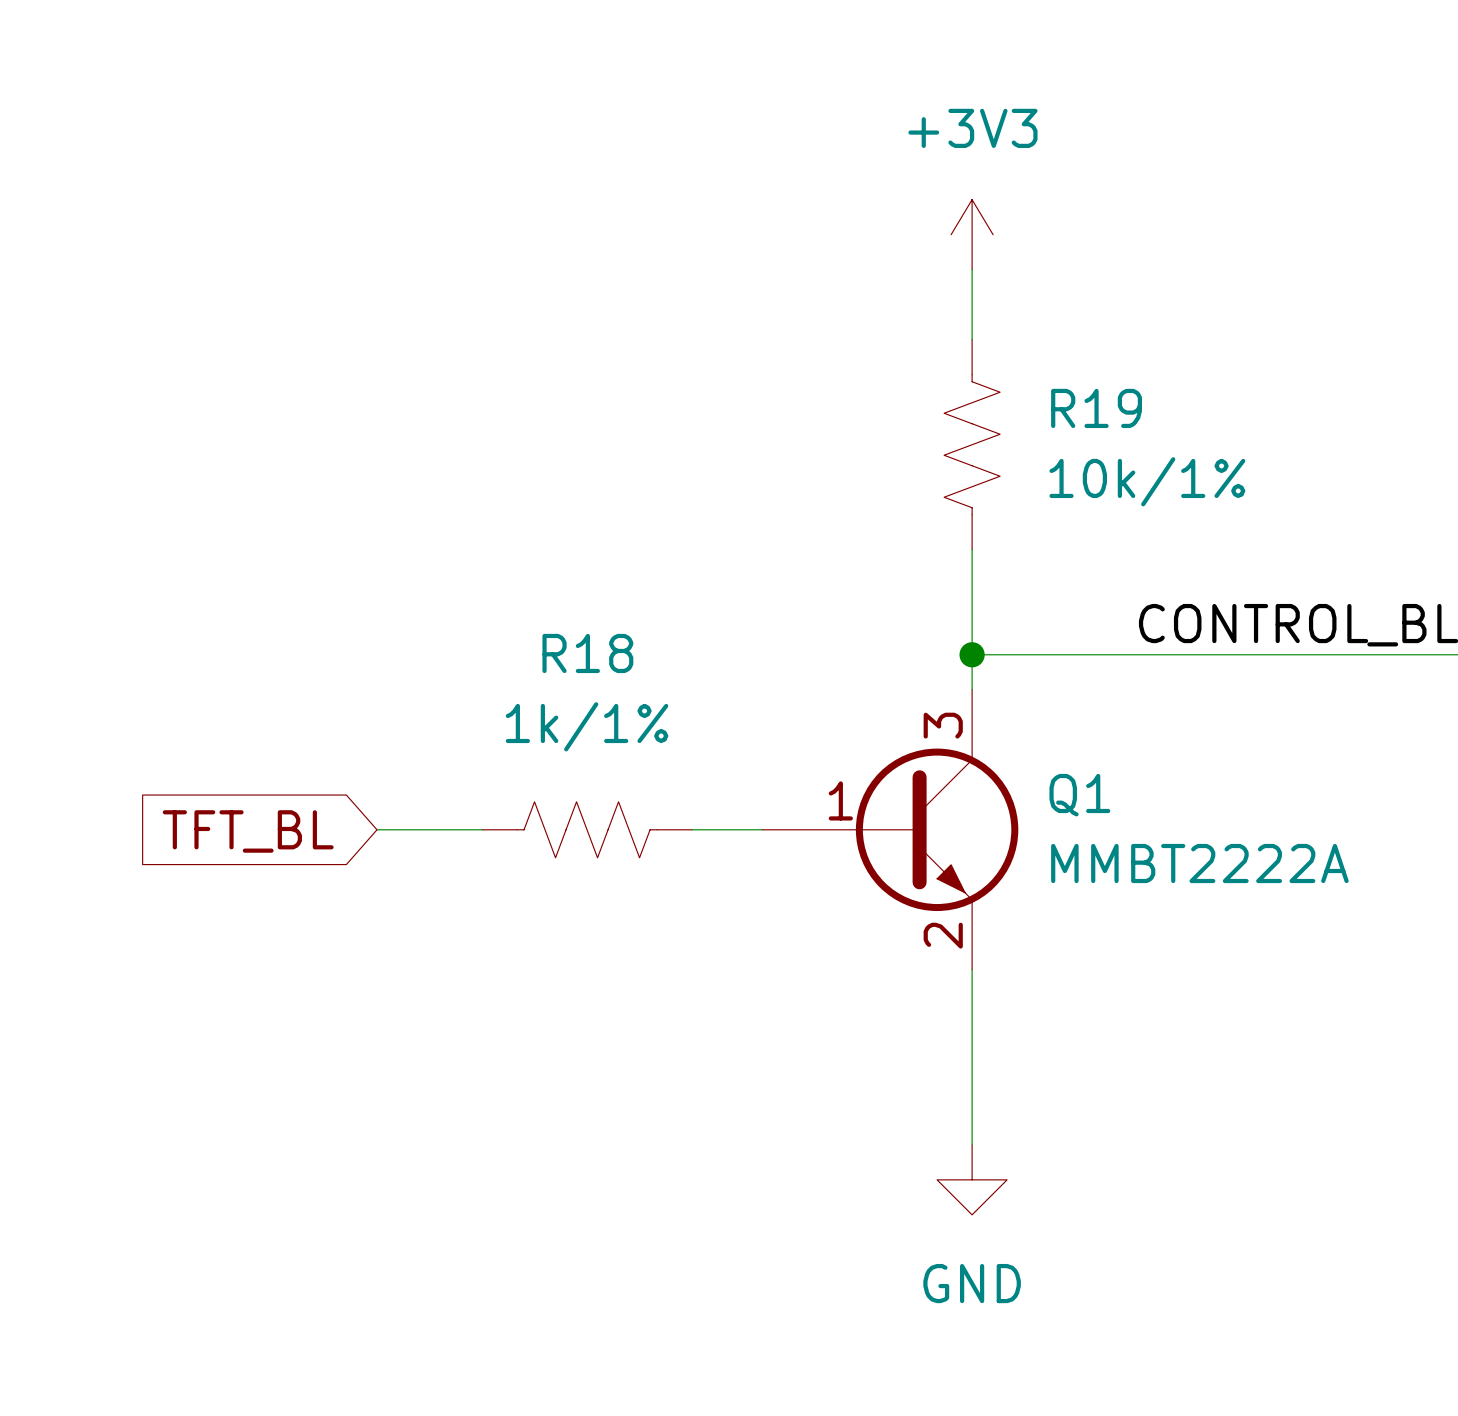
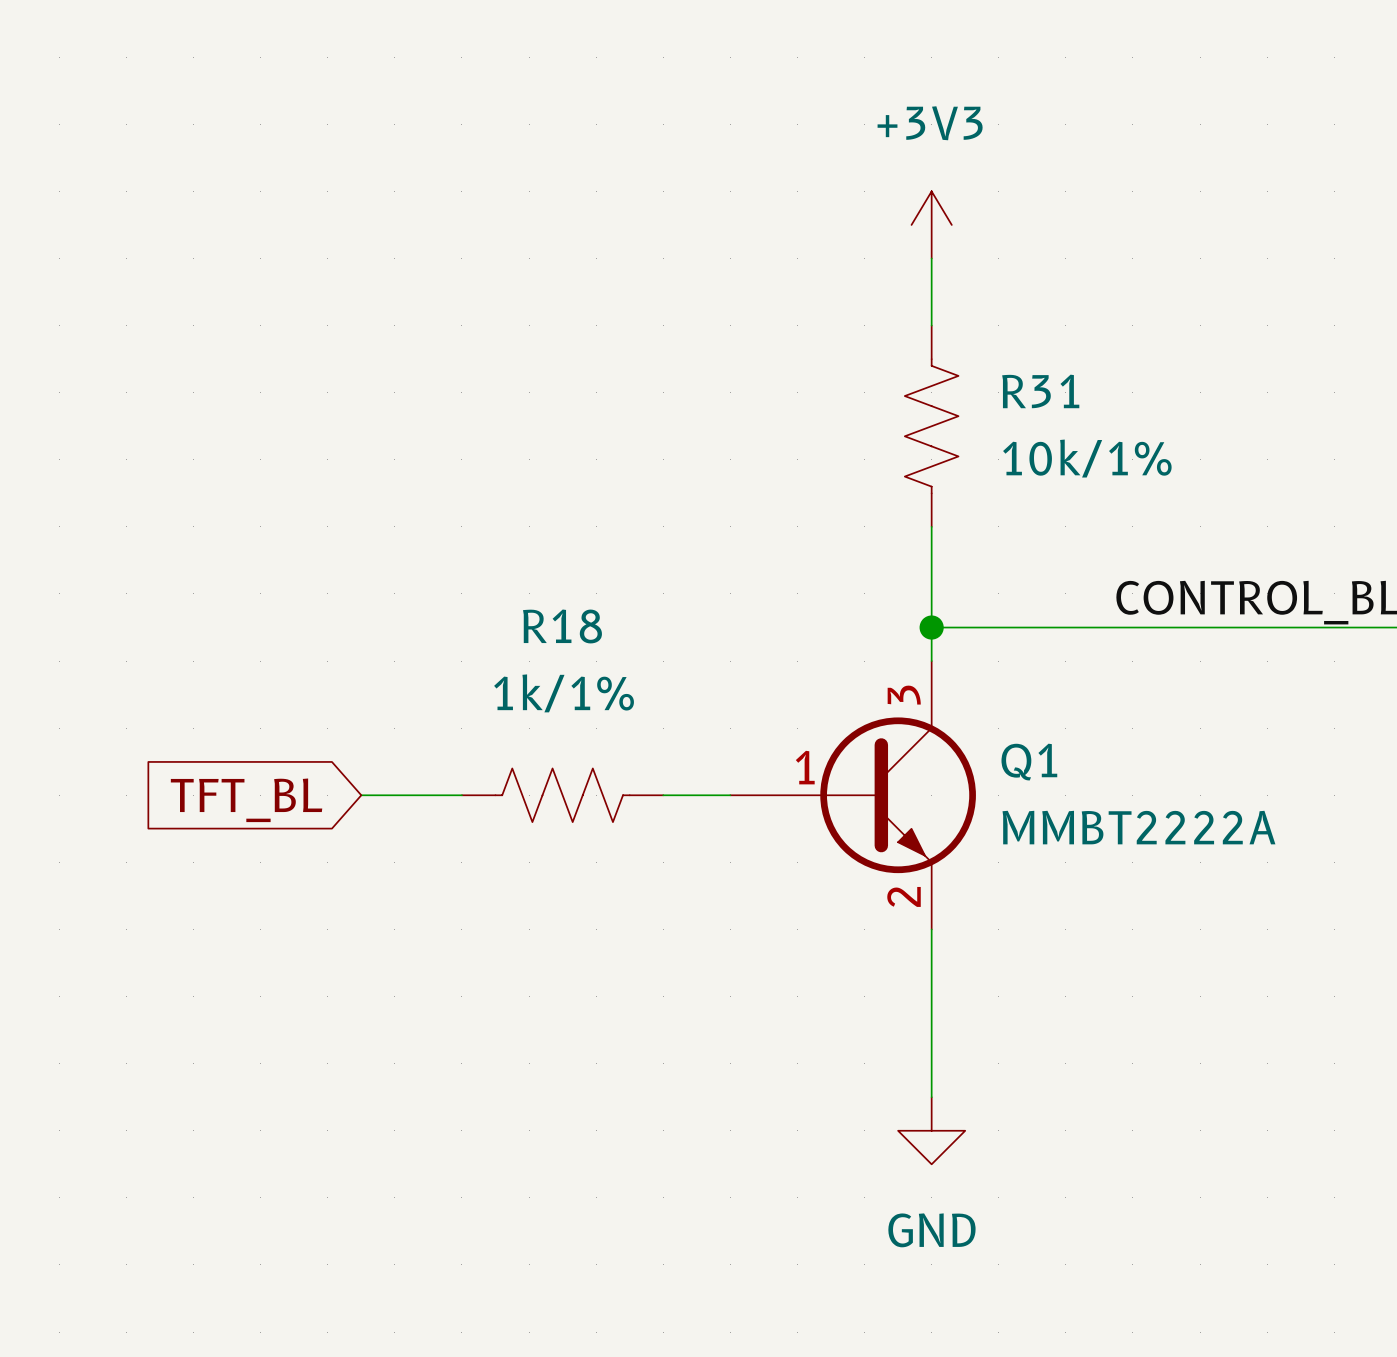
R19 name: R19 (1096, 408) -> R31 (1040, 391)

